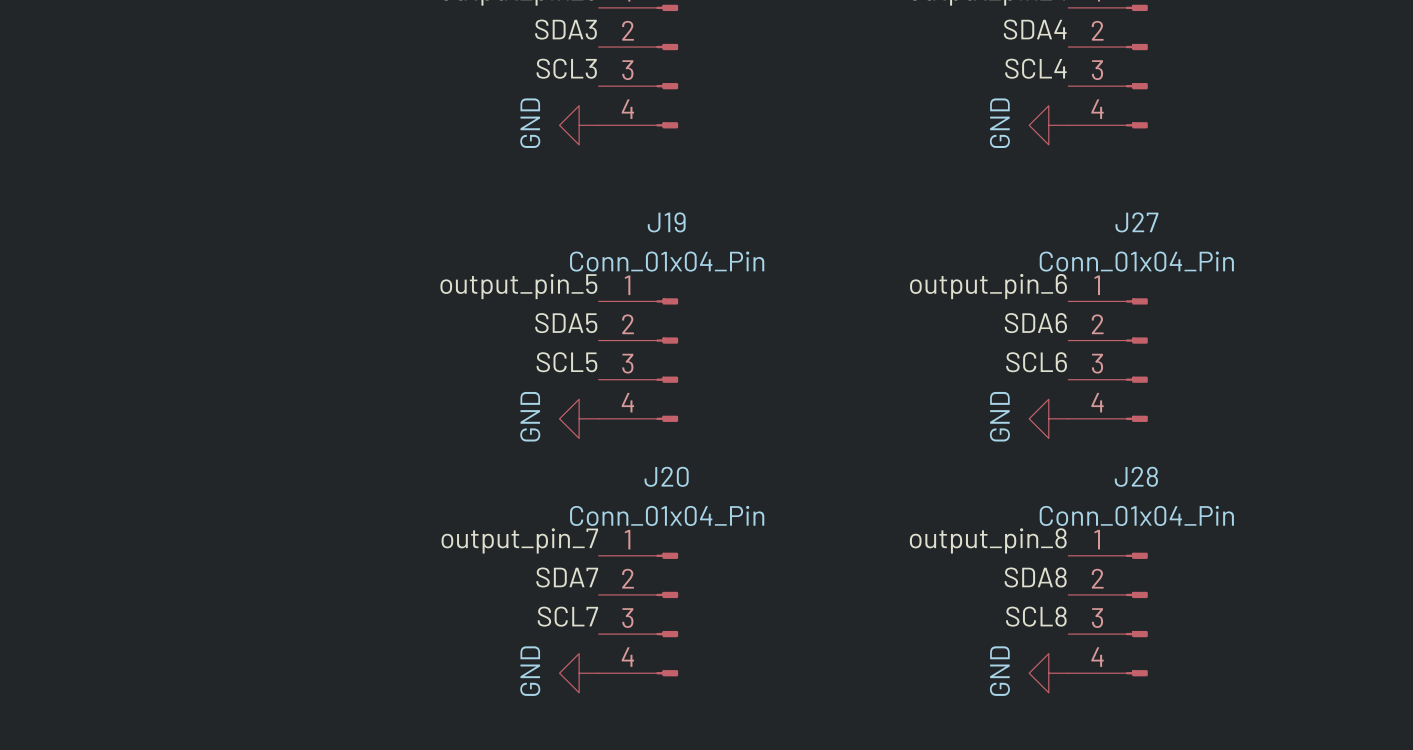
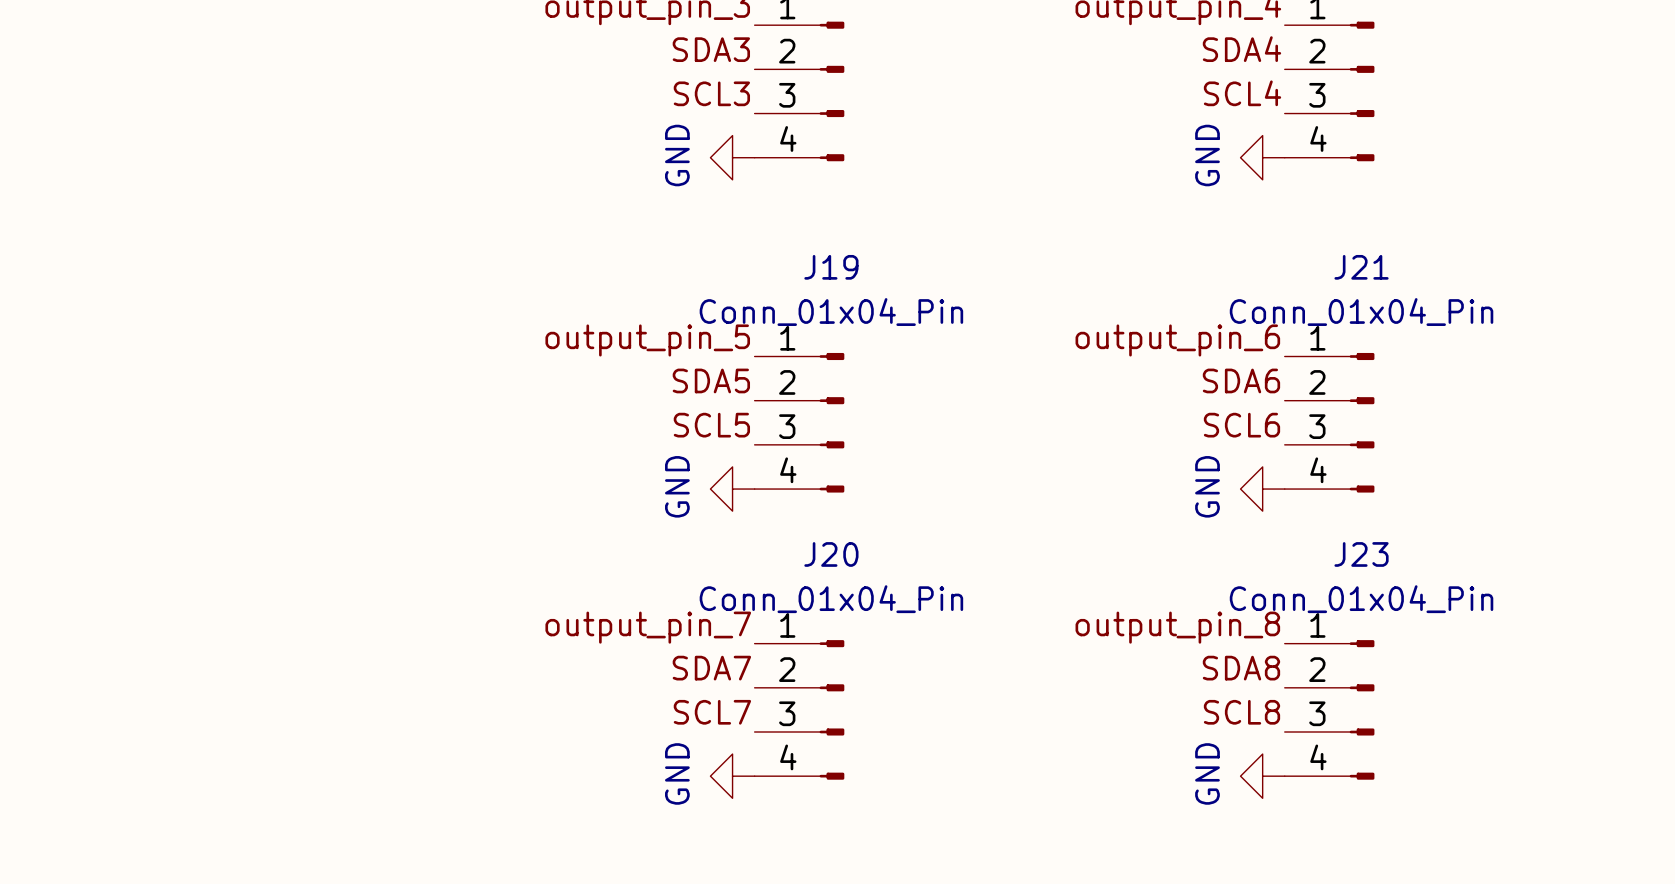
J27 name: J27 (1136, 222) -> J21 (1361, 267)
J28 name: J28 (1136, 476) -> J23 (1361, 554)

